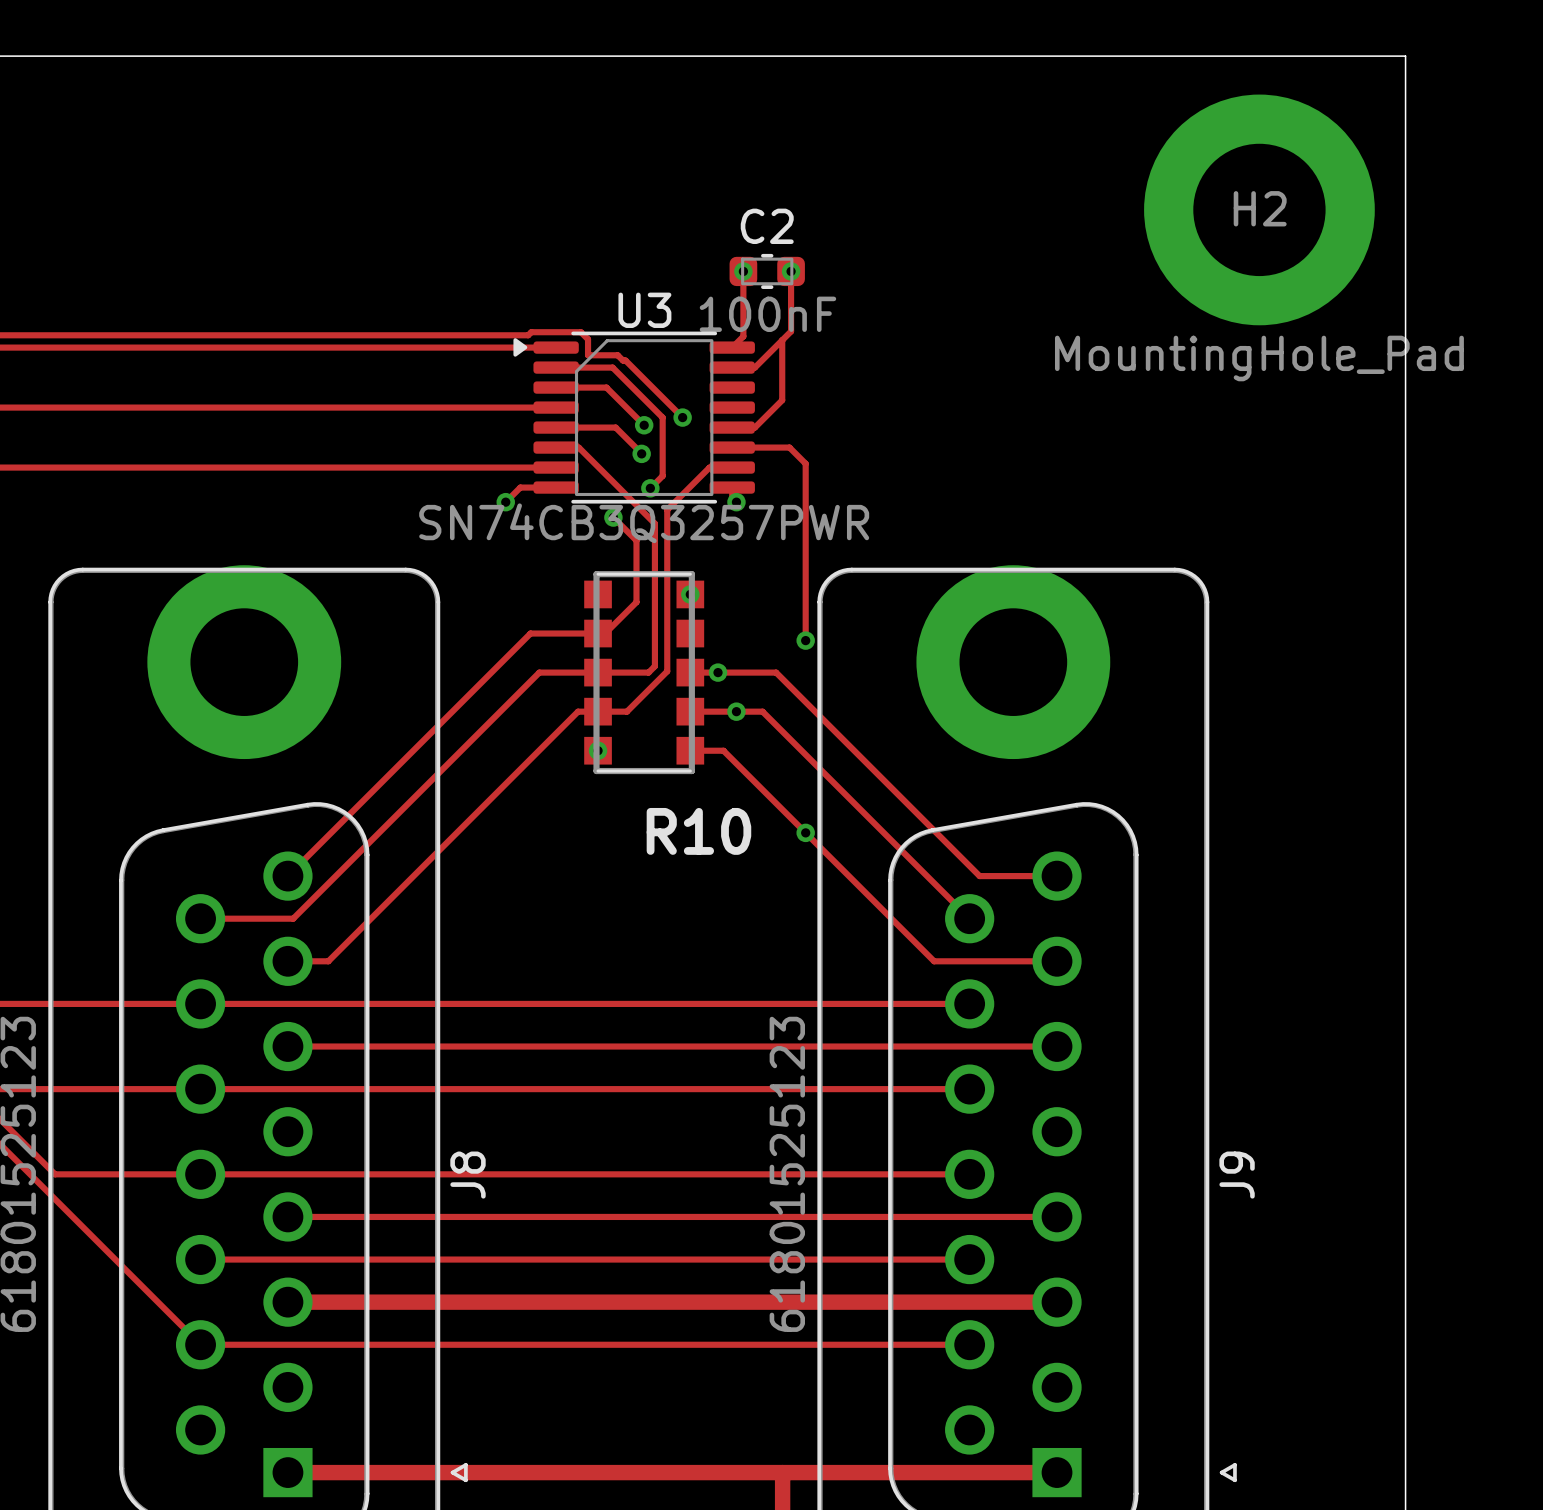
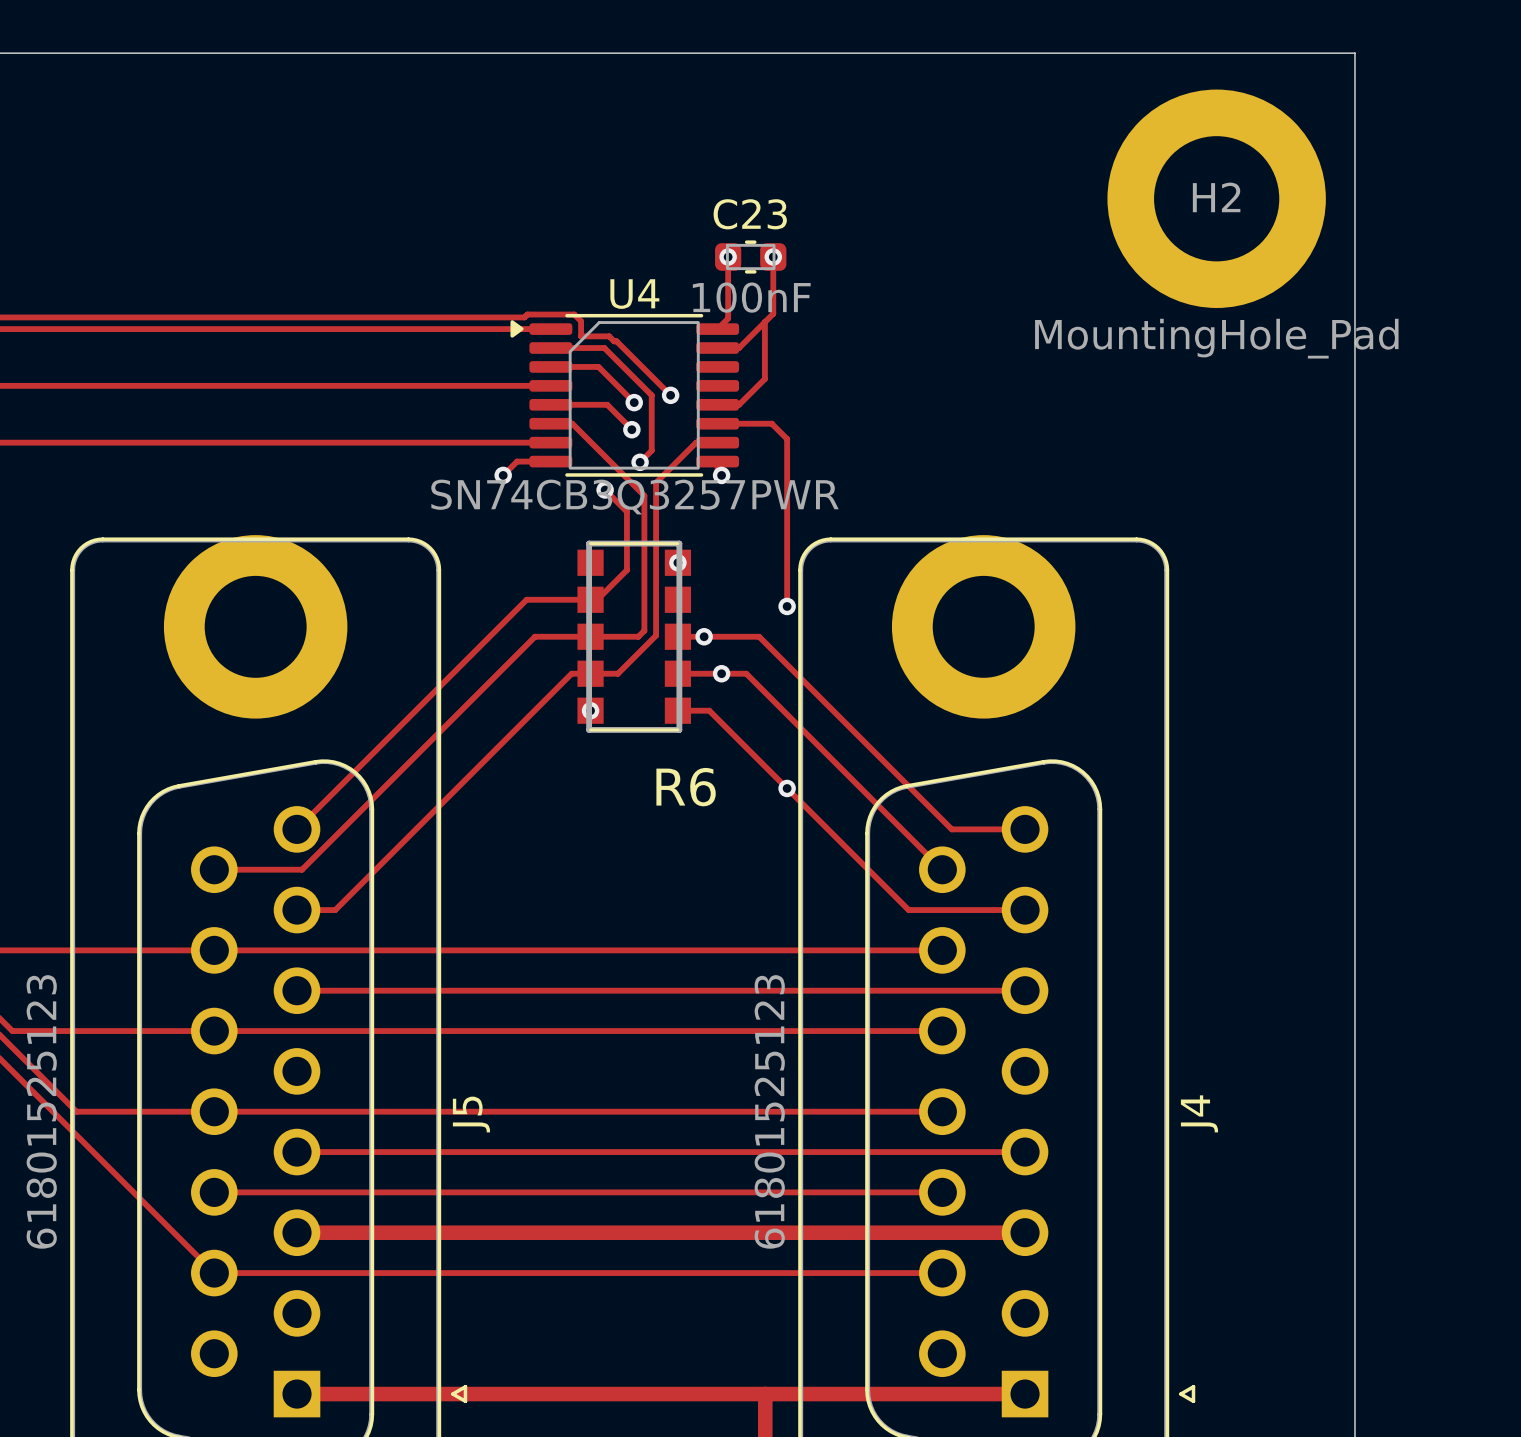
C2 name: C2 (767, 226) -> C23 (750, 214)
U3 name: U3 (644, 310) -> U4 (634, 294)
R10 name: R10 (698, 831) -> R6 (686, 787)
J8 name: J8 (467, 1175) -> J5 (471, 1114)
J9 name: J9 (1237, 1175) -> J4 (1199, 1113)

